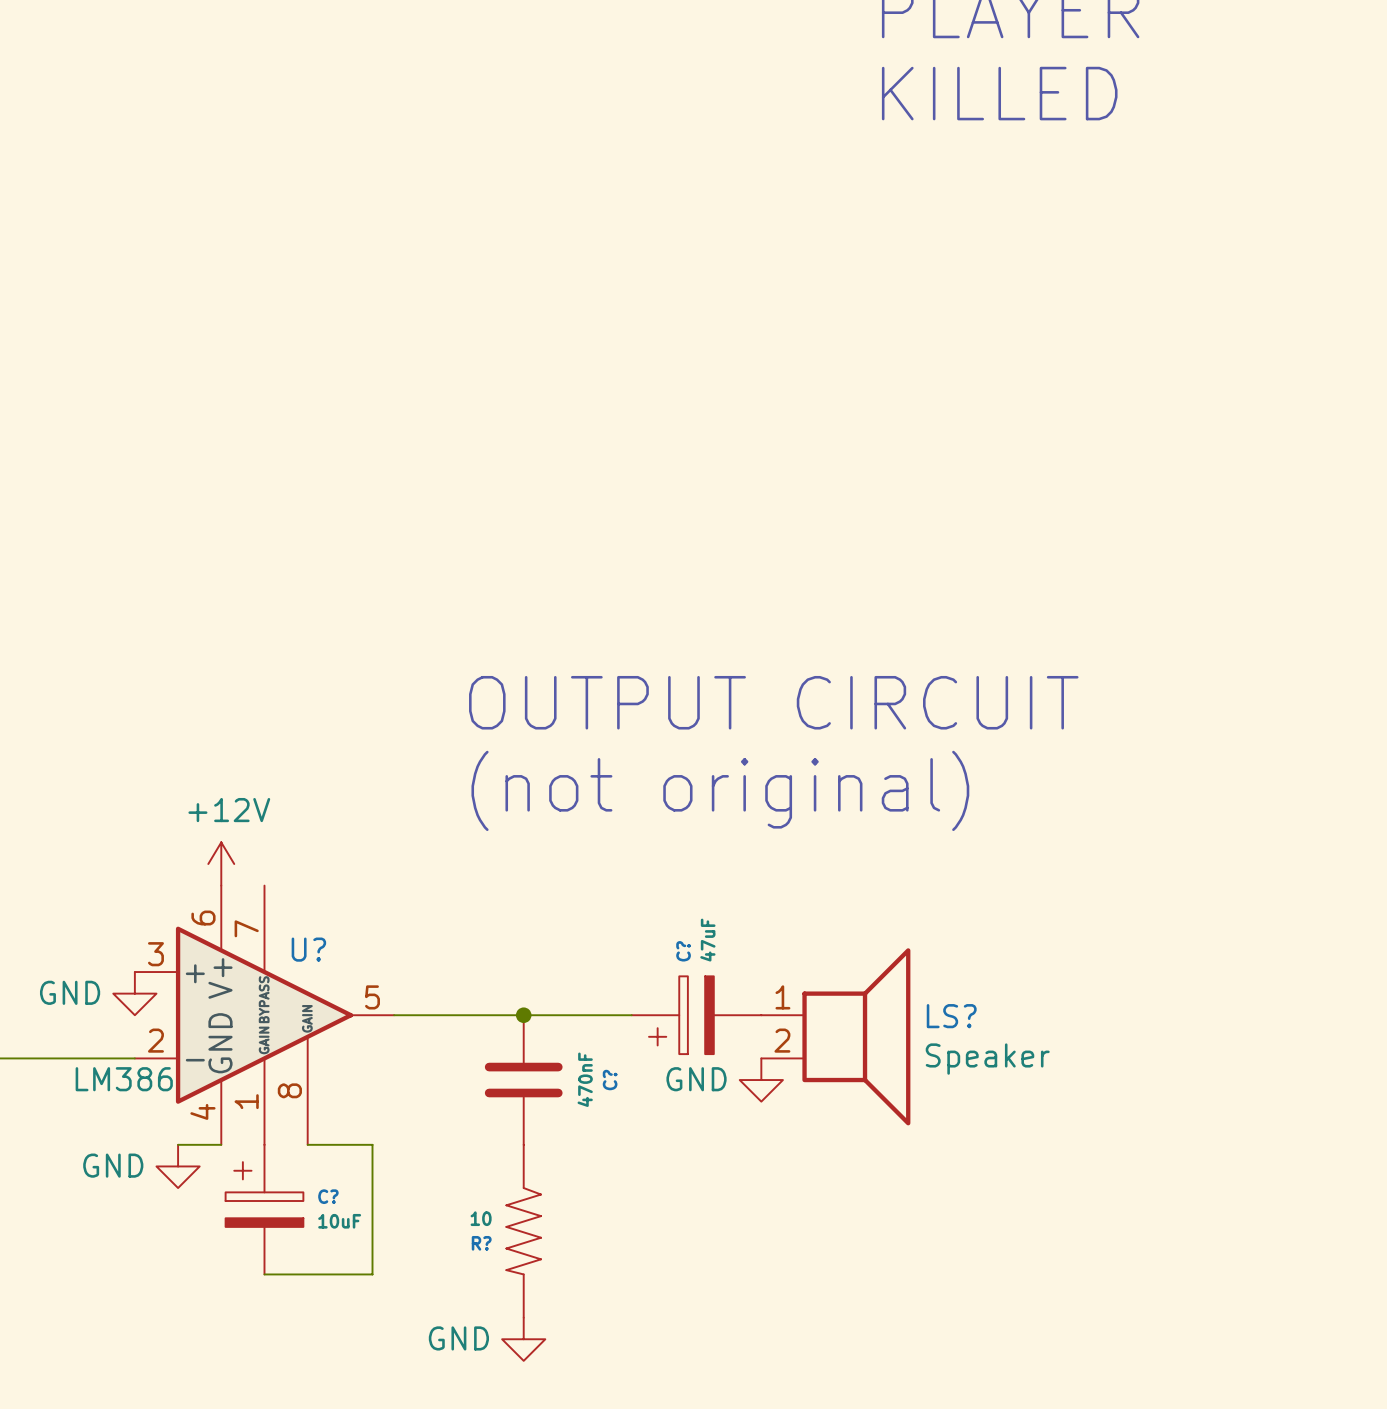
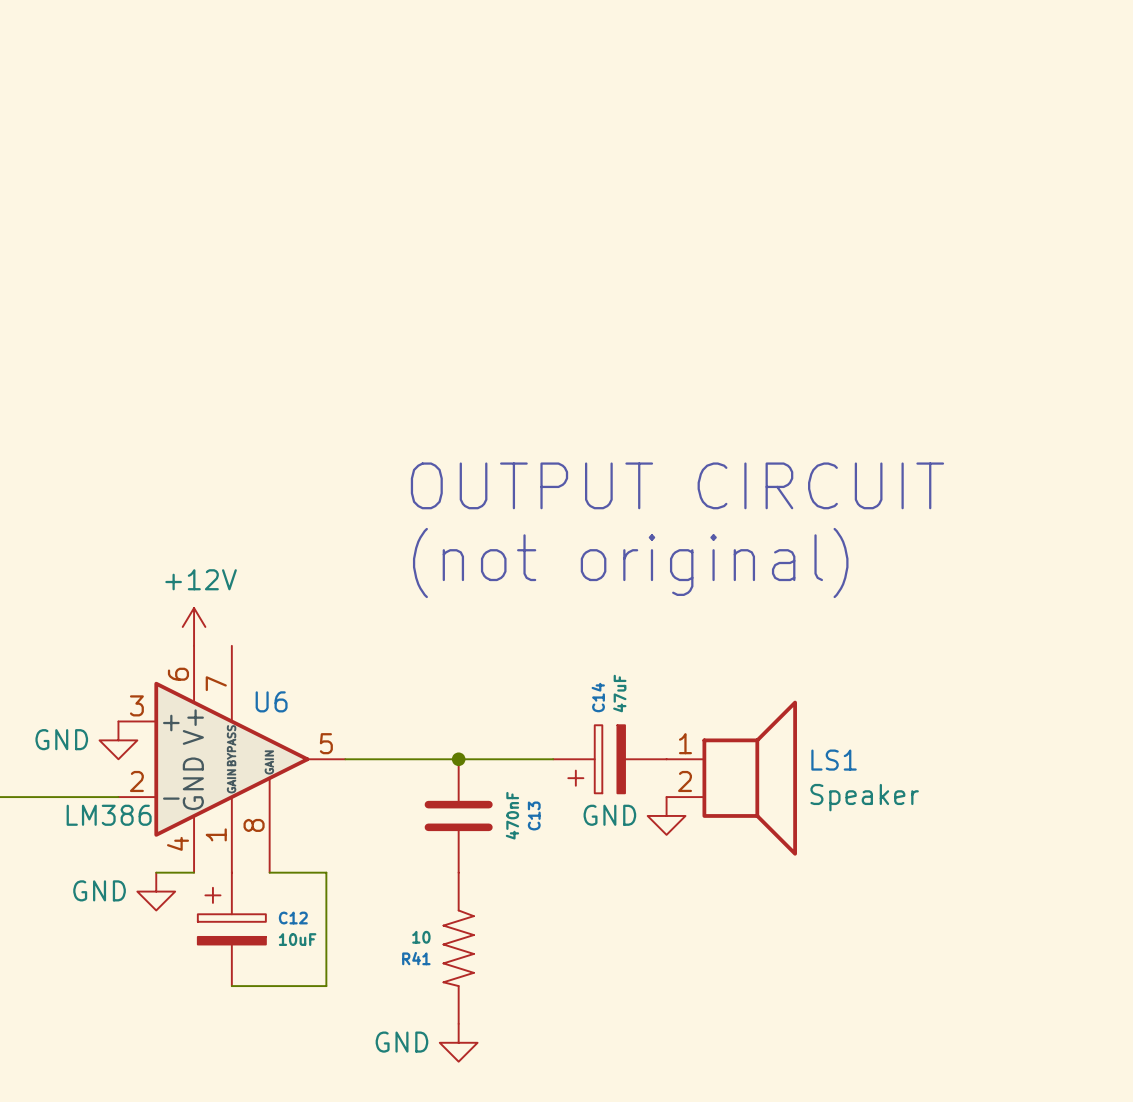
U? name: U? (308, 949) -> U6 (271, 701)
C? name: C? (683, 951) -> C14 (598, 697)
LS? name: LS? (951, 1016) -> LS1 (834, 760)
C? name: C? (610, 1080) -> C13 (534, 815)
C? name: C? (328, 1196) -> C12 (293, 918)
R? name: R? (481, 1243) -> R41 (416, 958)

